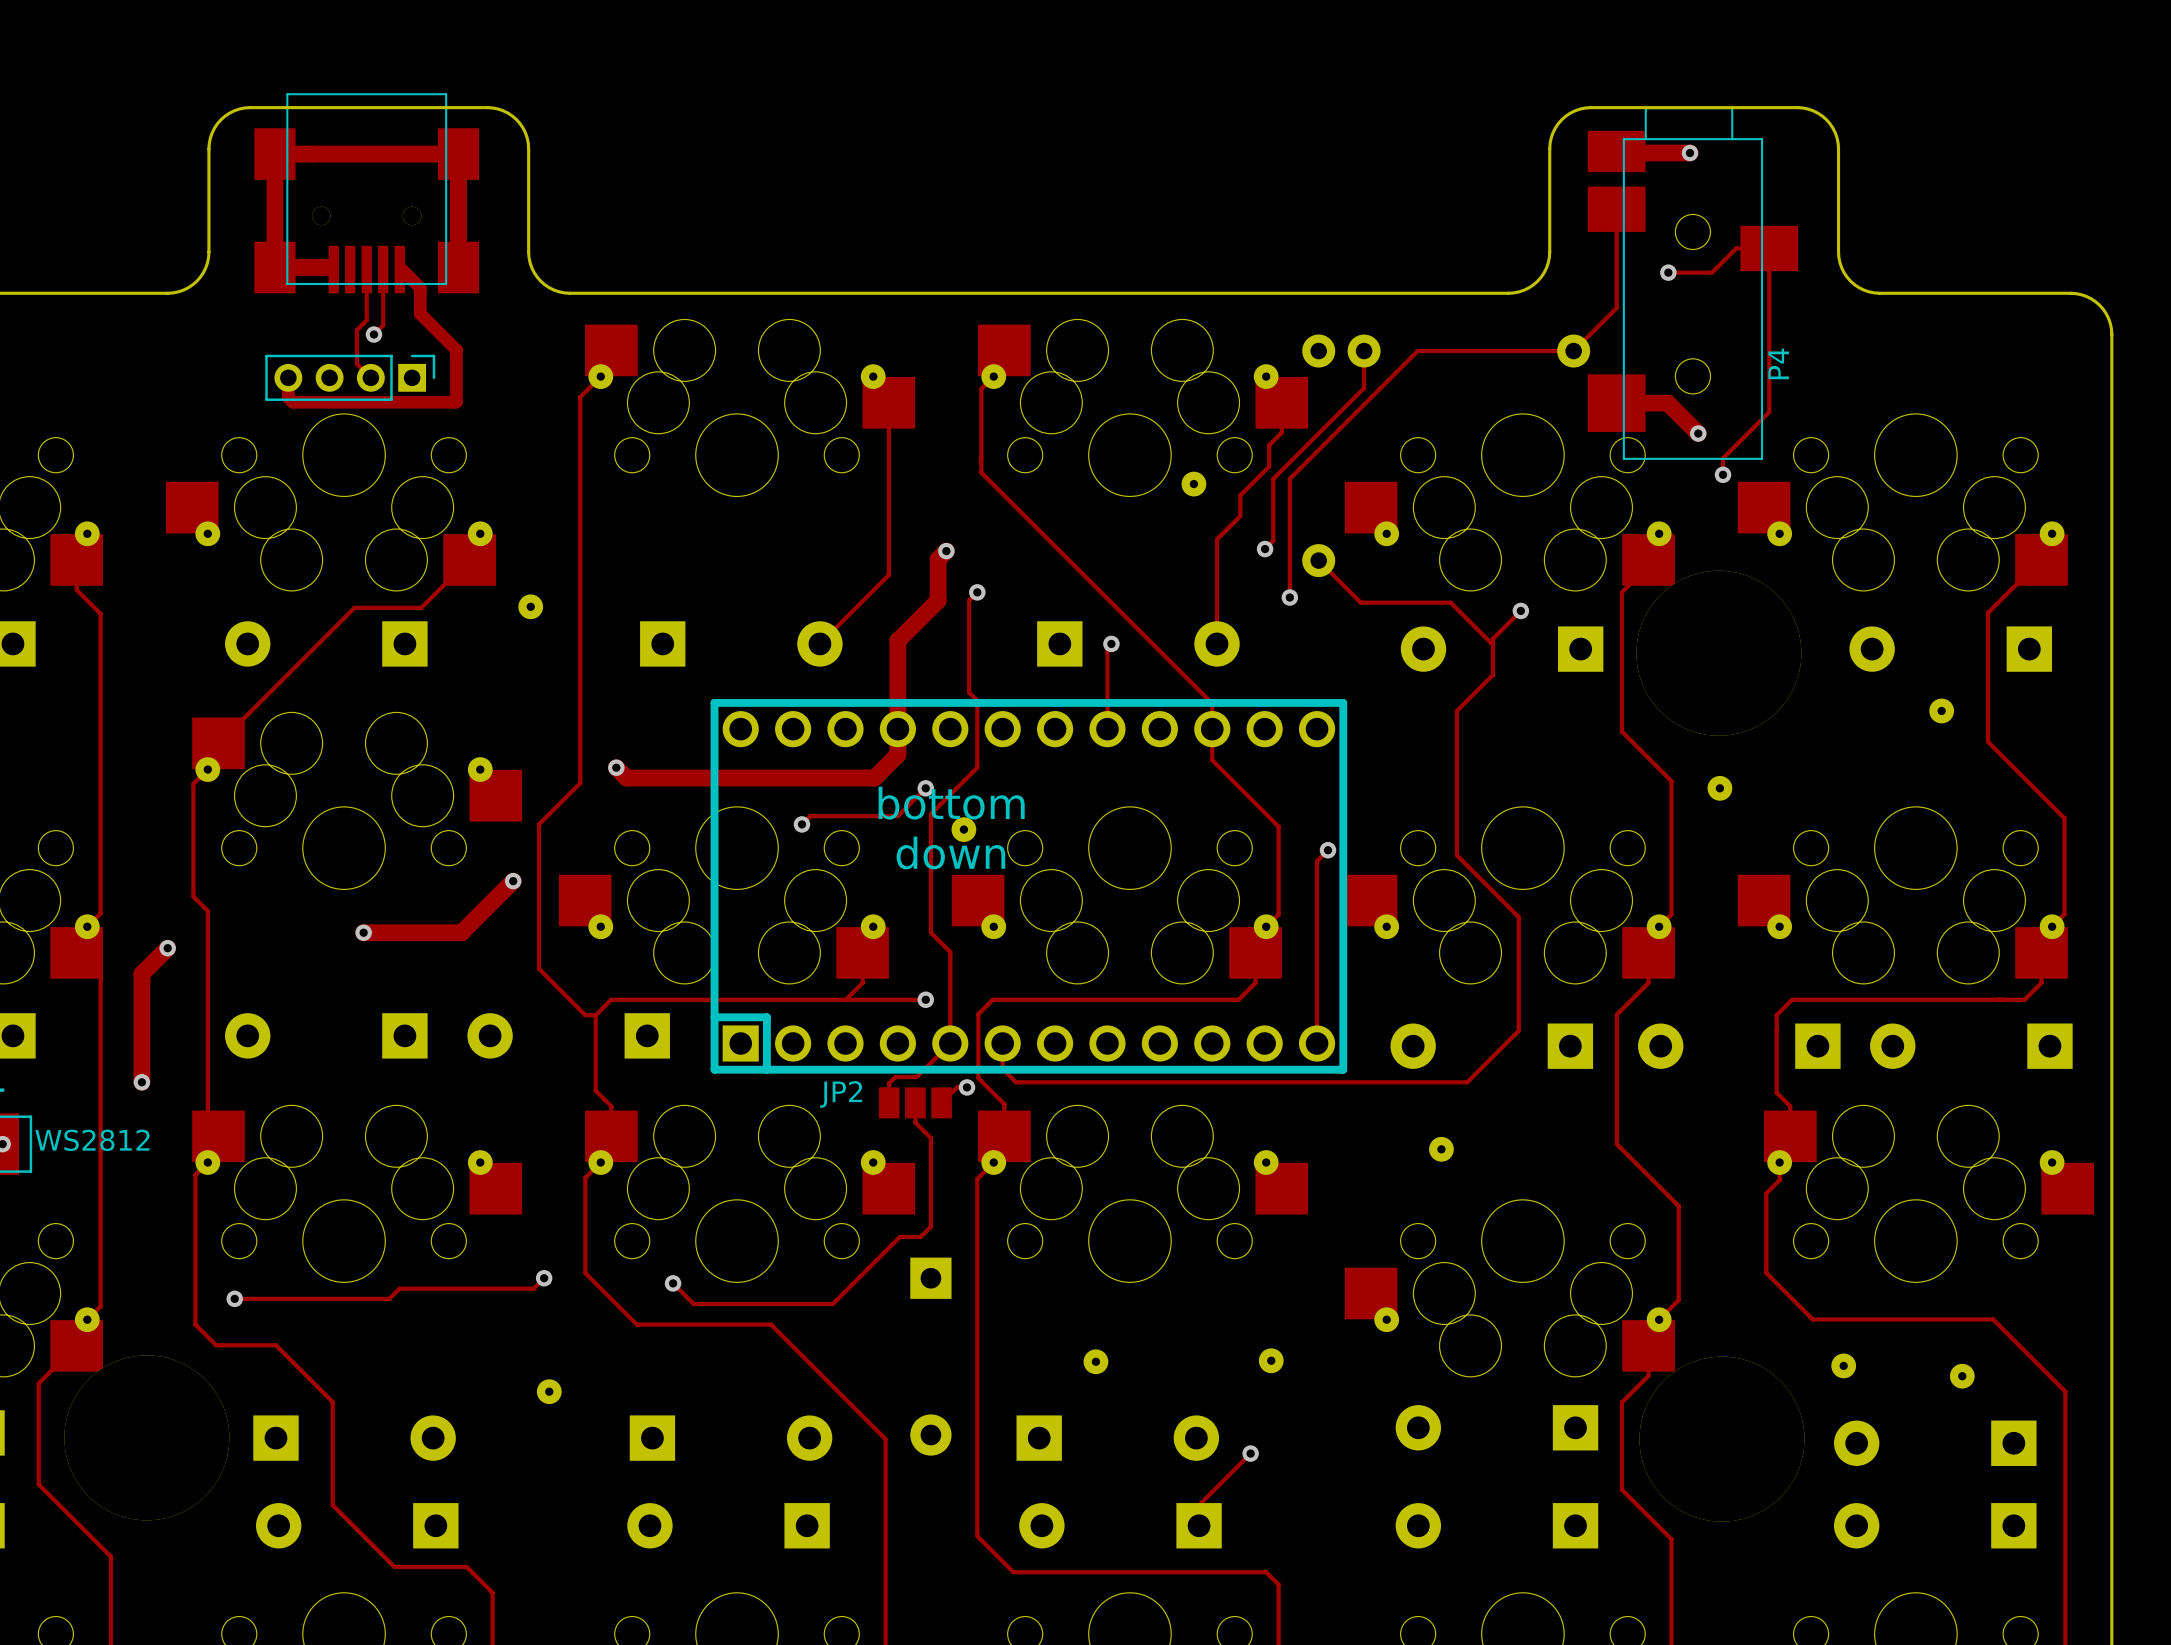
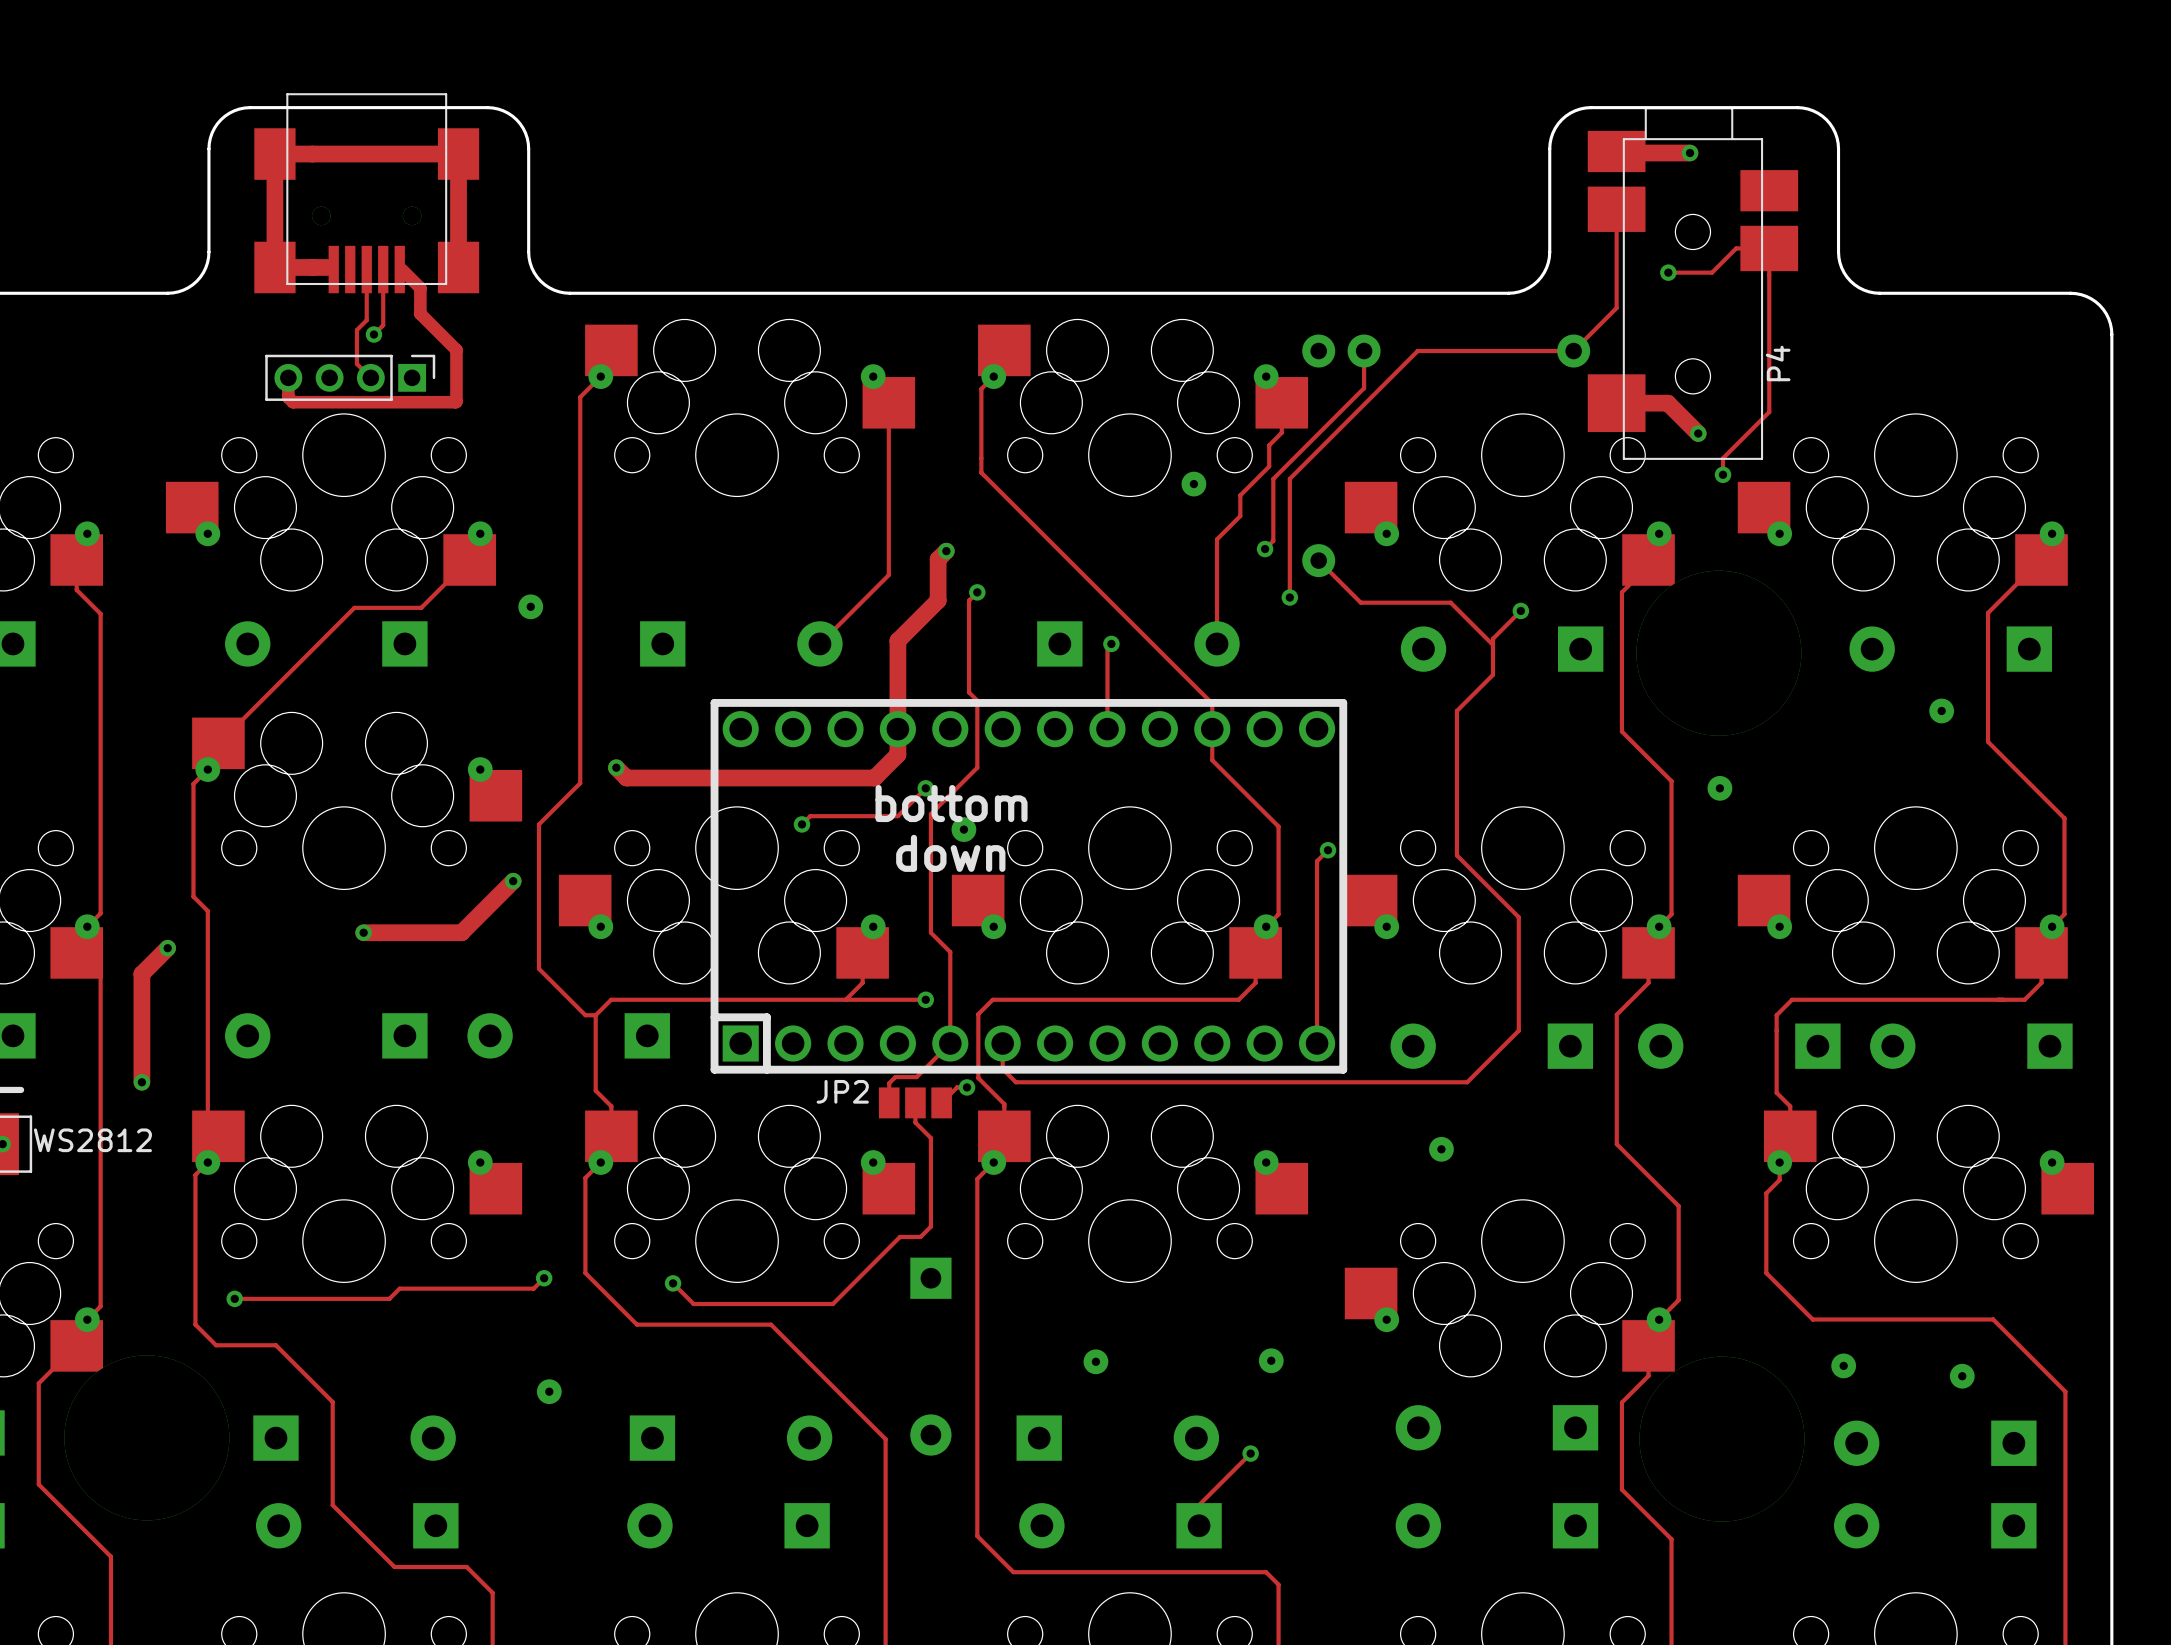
P4 footprint: [1587, 107, 1799, 460] -> [1587, 107, 1799, 460]

